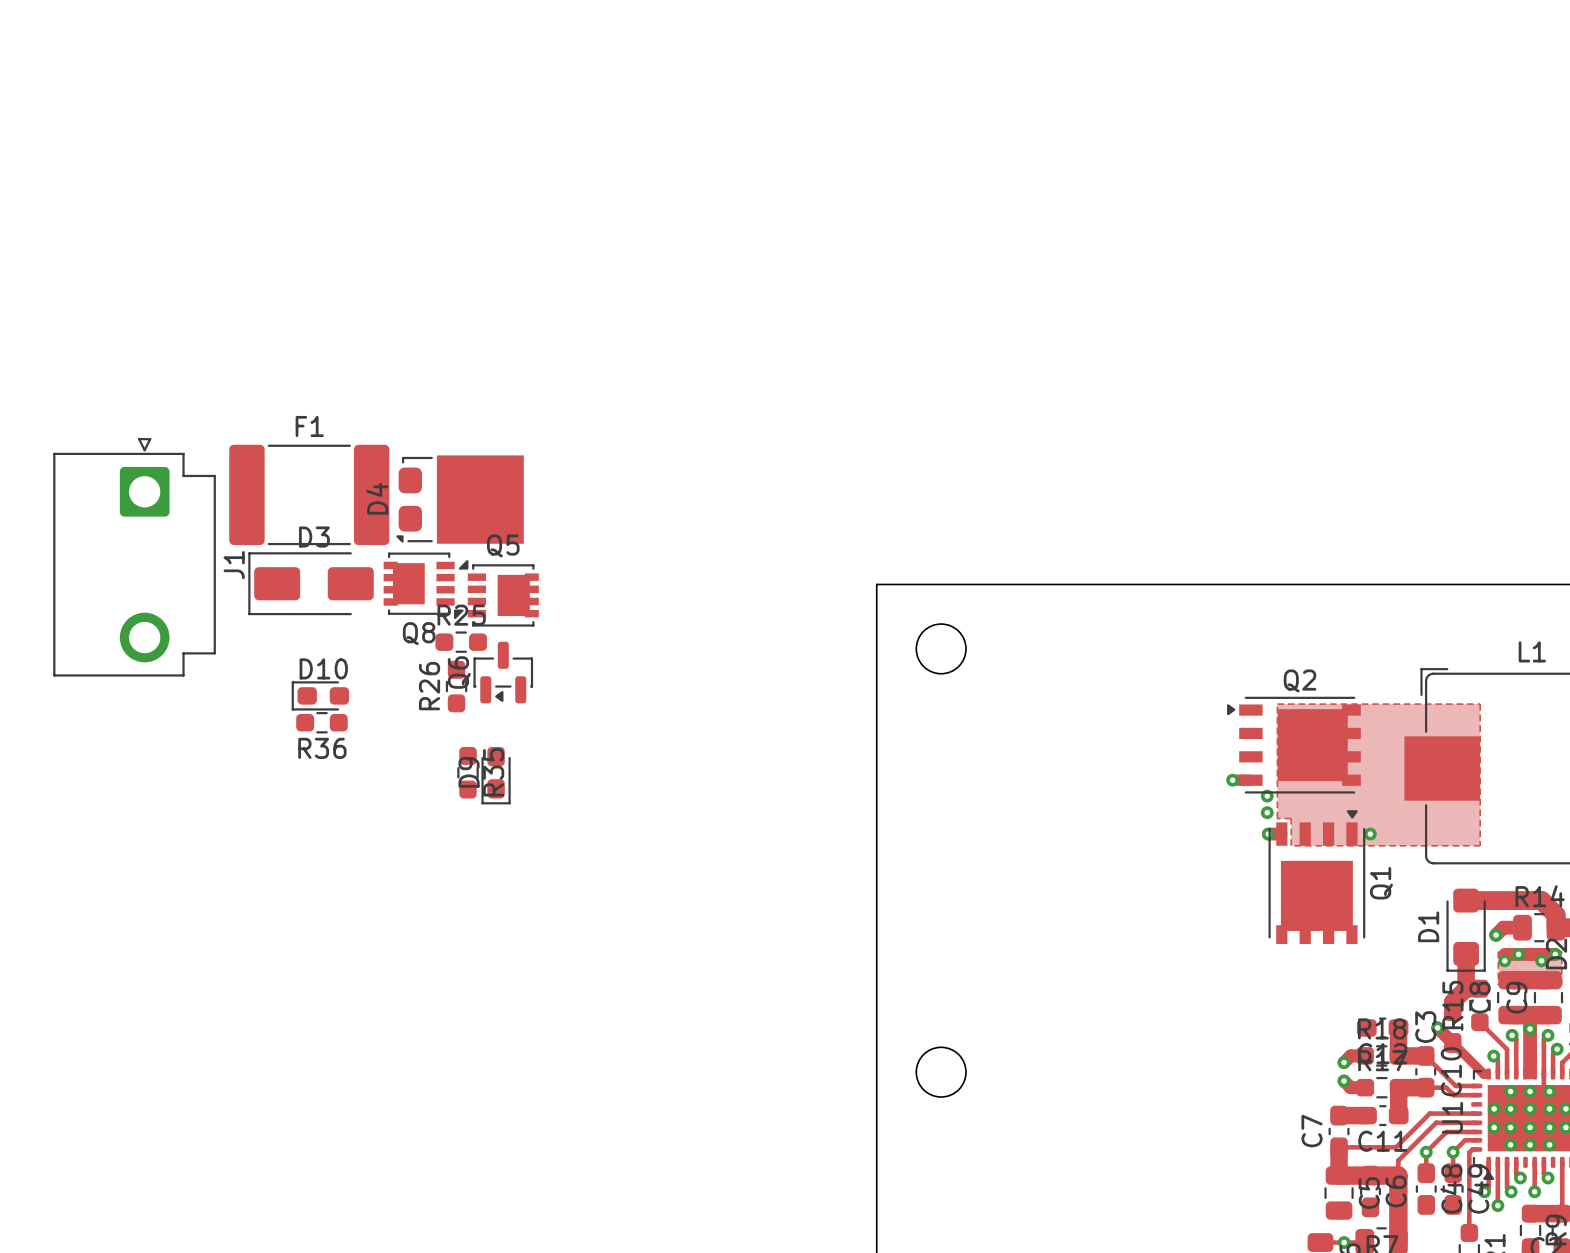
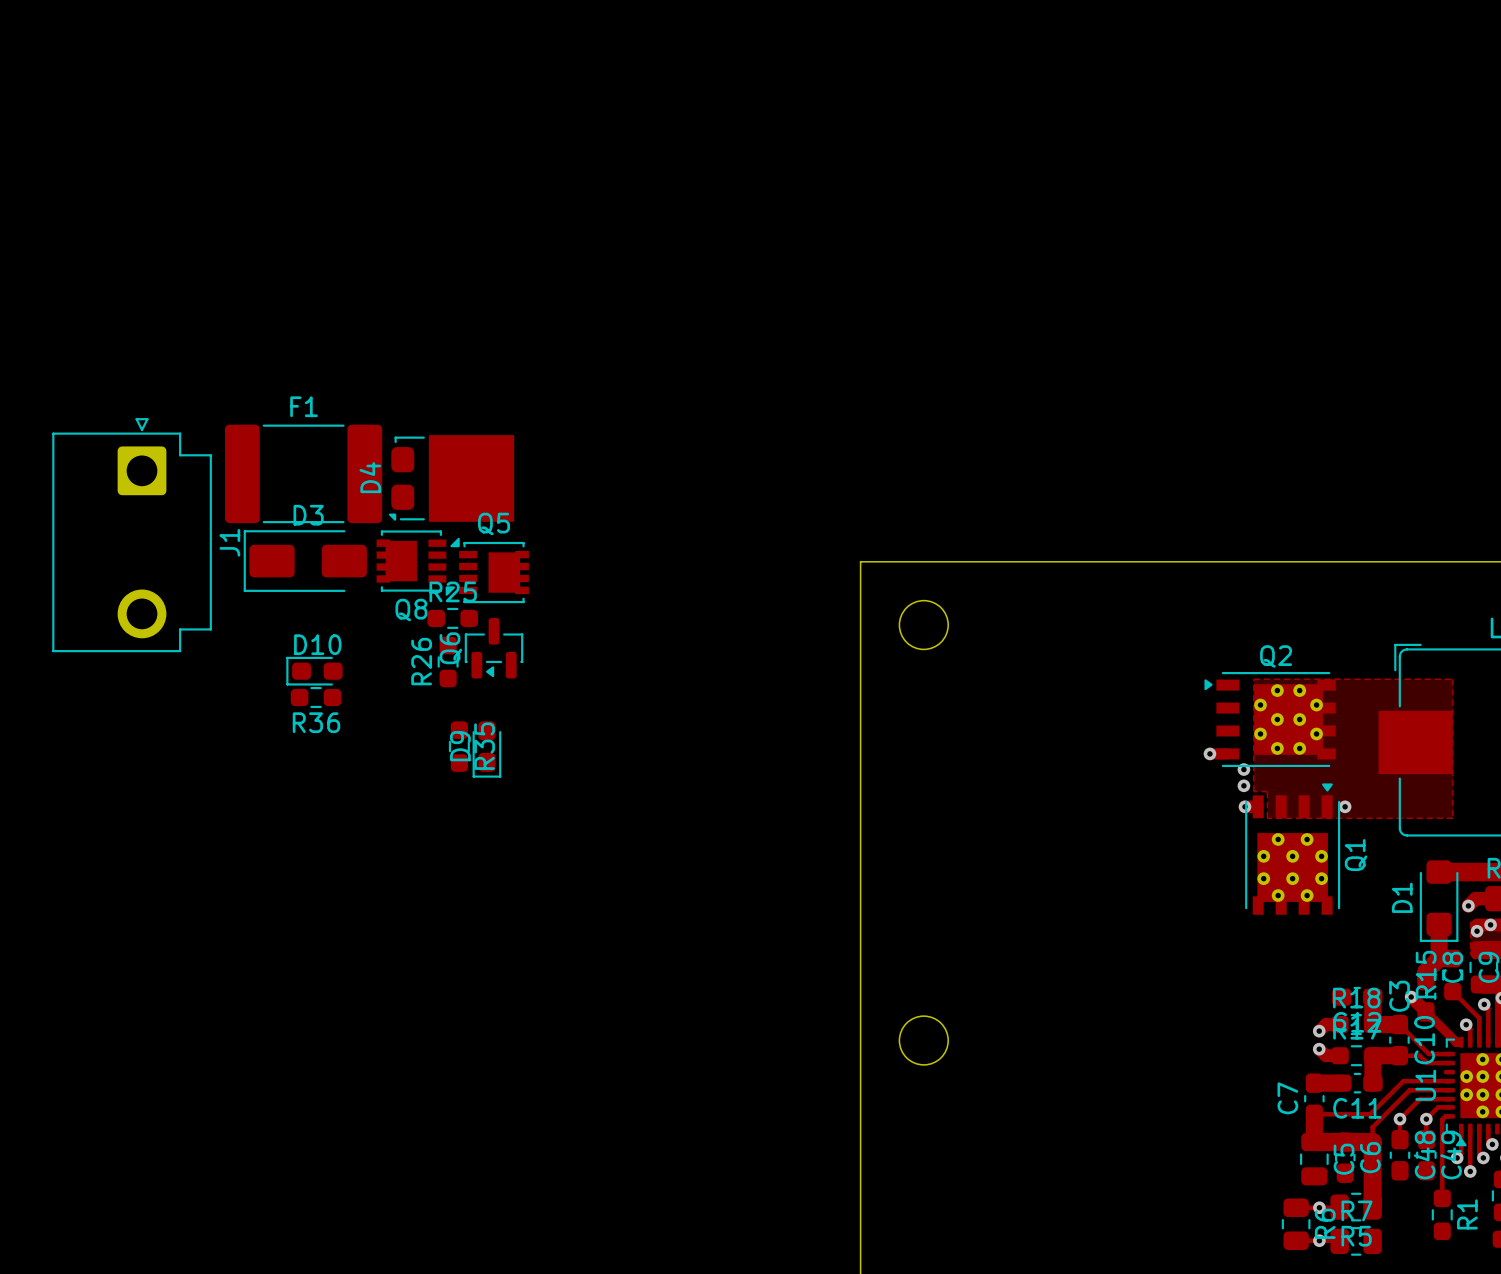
Q2 footprint: [1227, 696, 1361, 794] -> [1204, 672, 1336, 768]
Q1 footprint: [1268, 810, 1366, 945] -> [1245, 783, 1341, 915]

